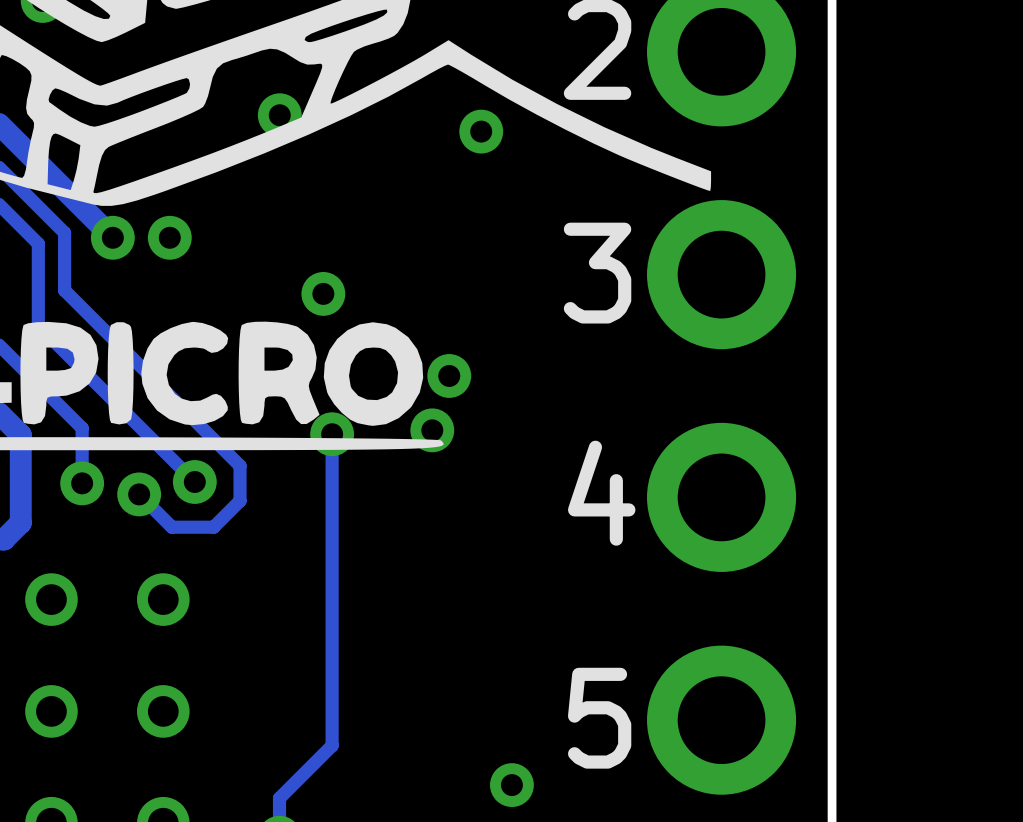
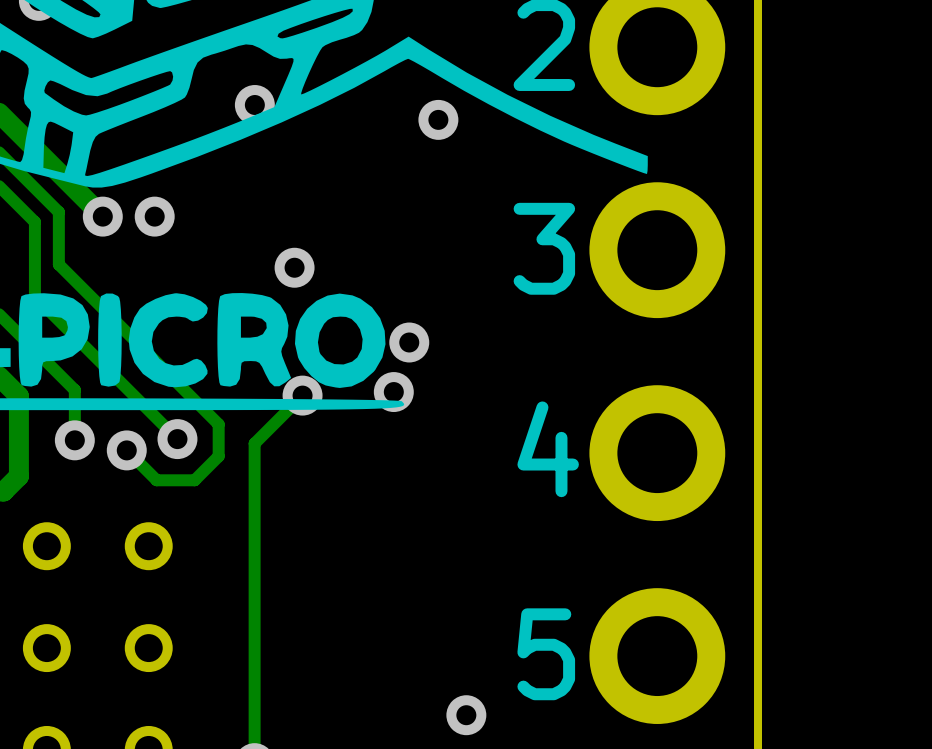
track: (332, 434) (332, 745) (279, 798) -> (302, 395) (254, 443) (254, 727)

